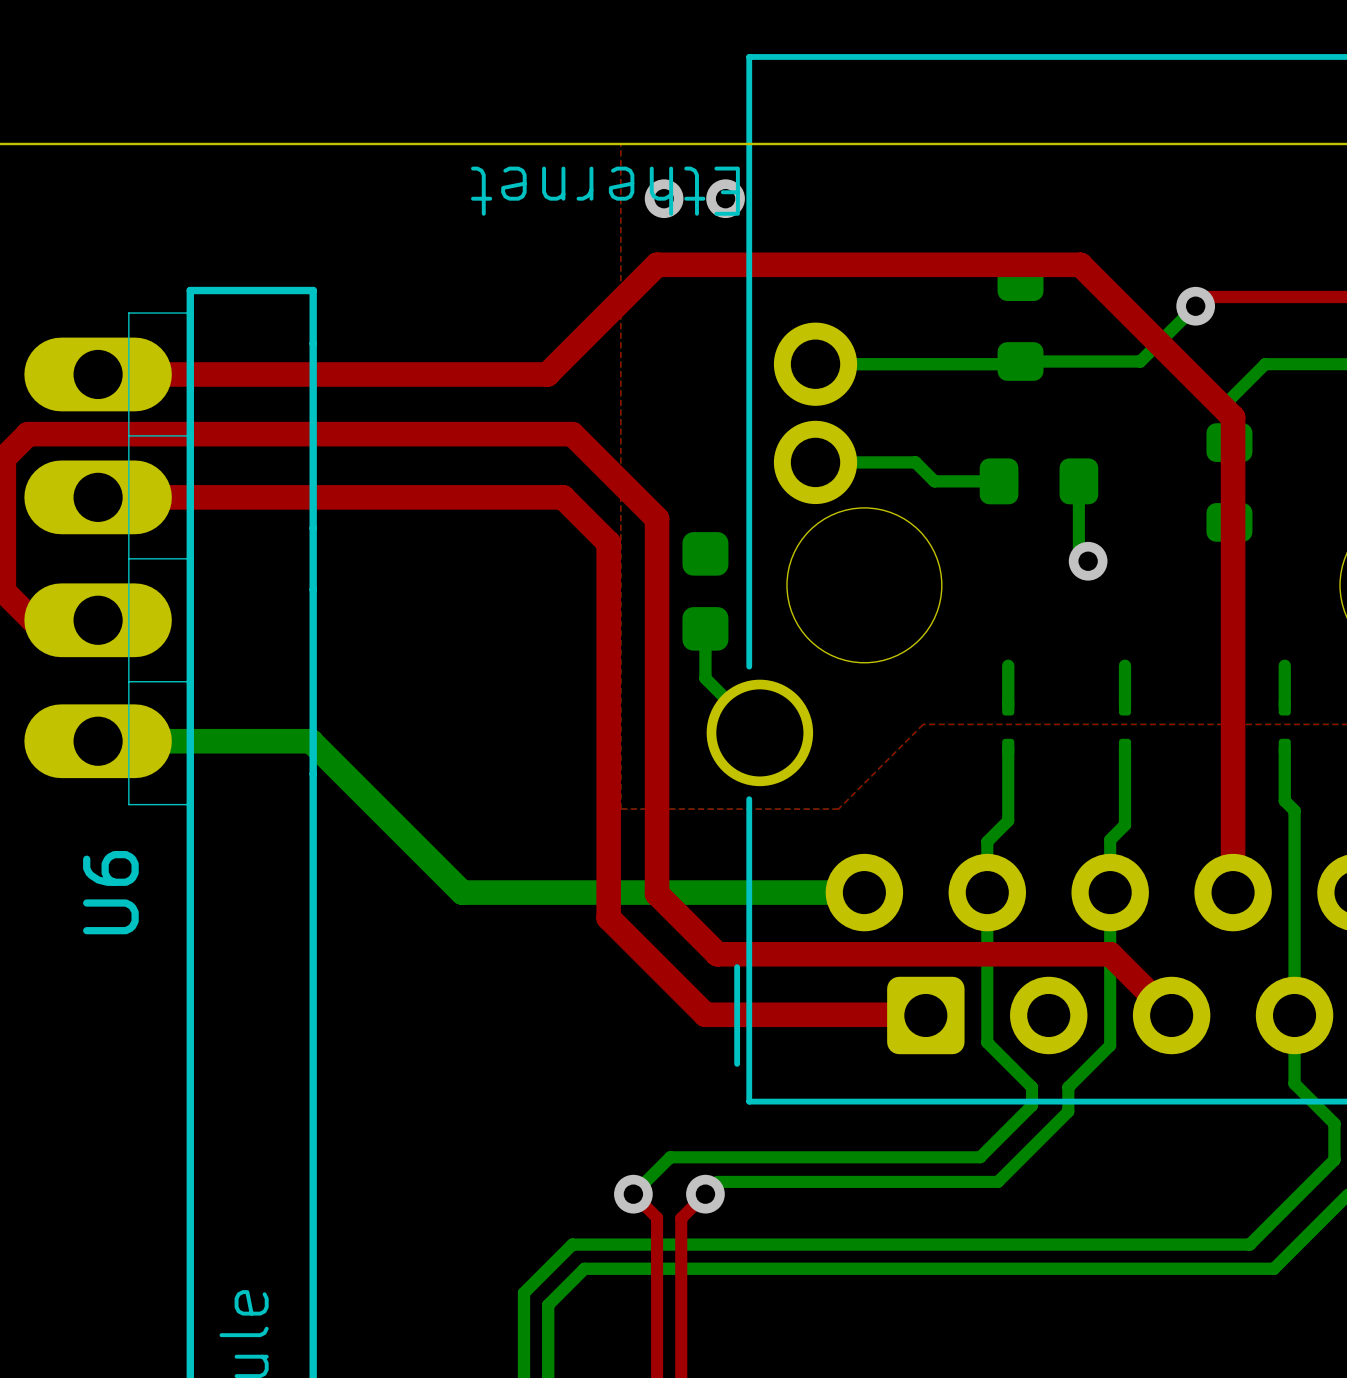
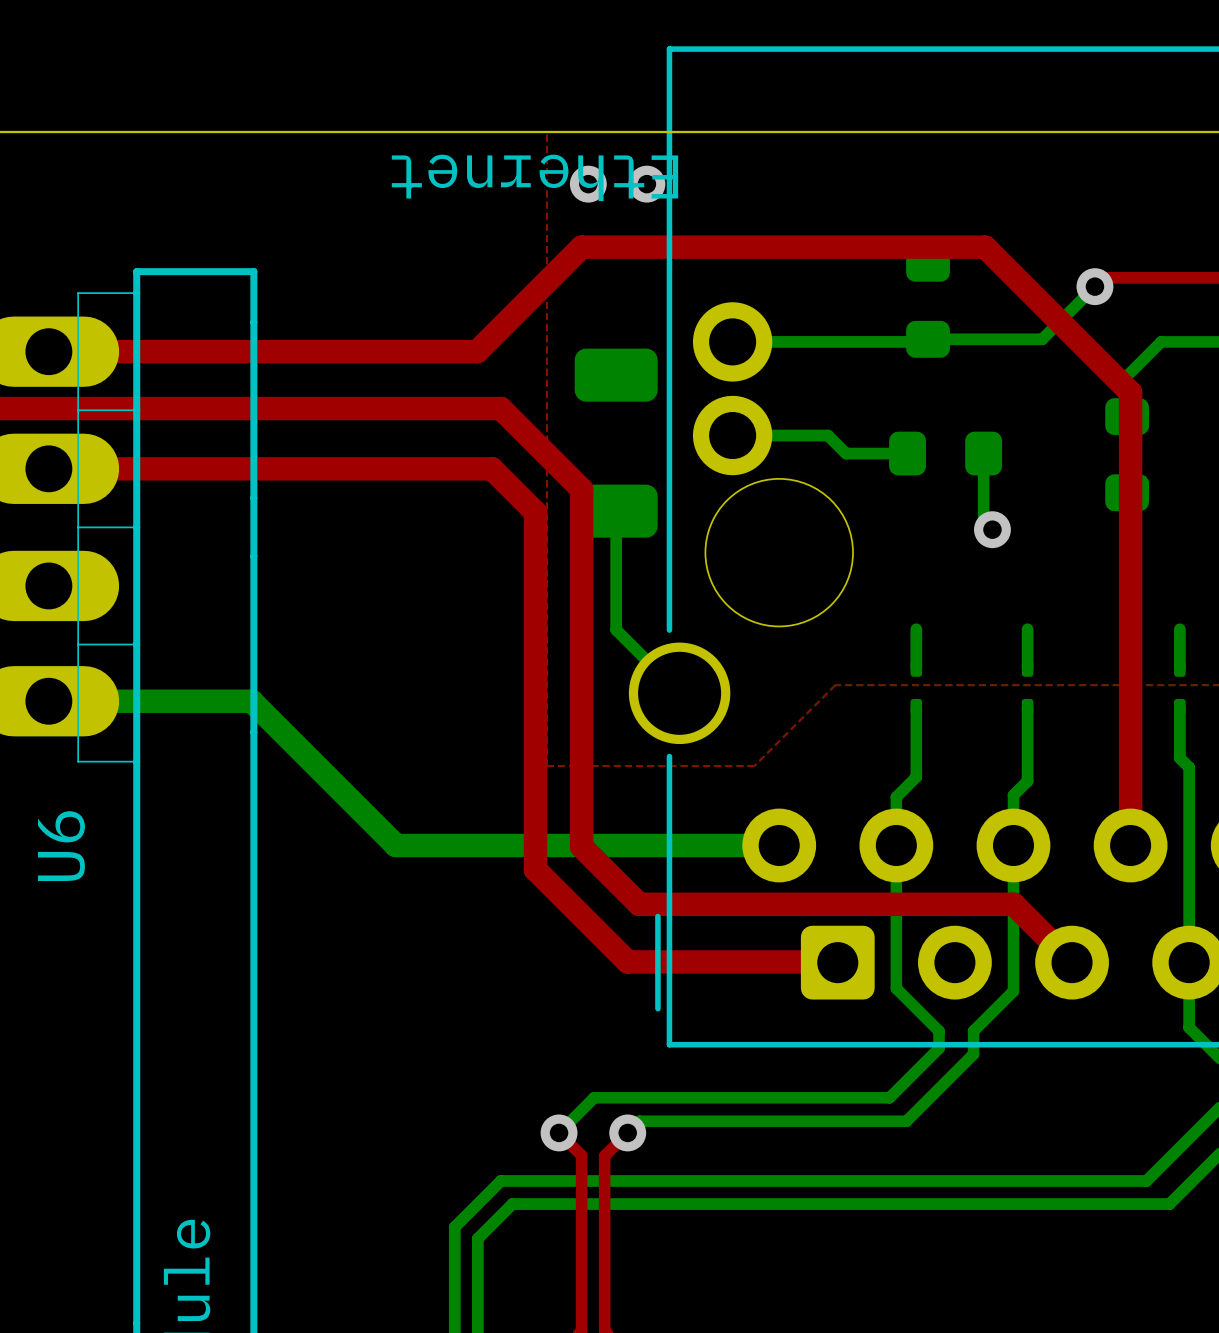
part: none -> (616, 443)
part: (705, 591) -> none
bottom track: (705, 628) (705, 678) -> (616, 511) (616, 629) (627, 641)

